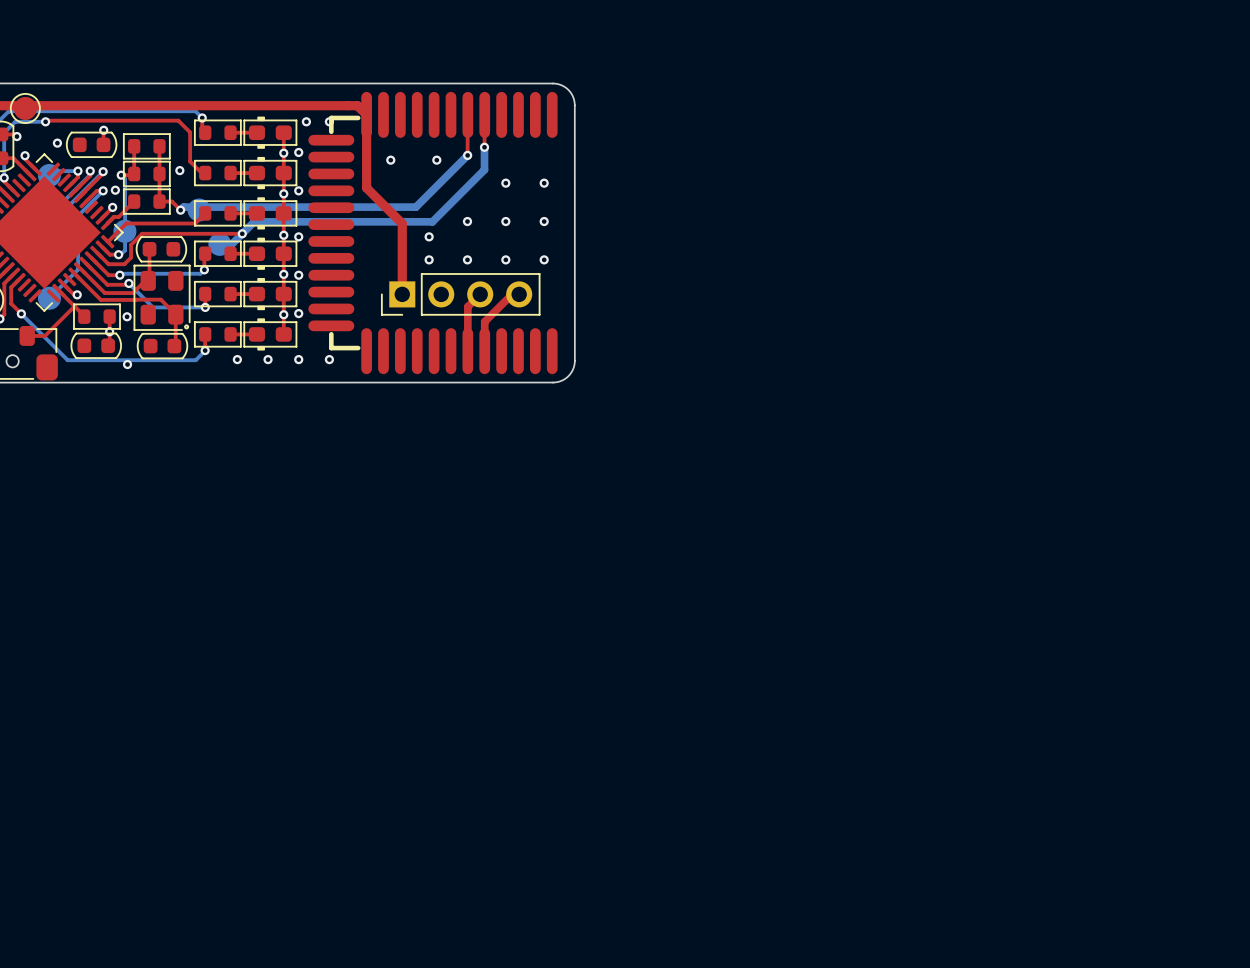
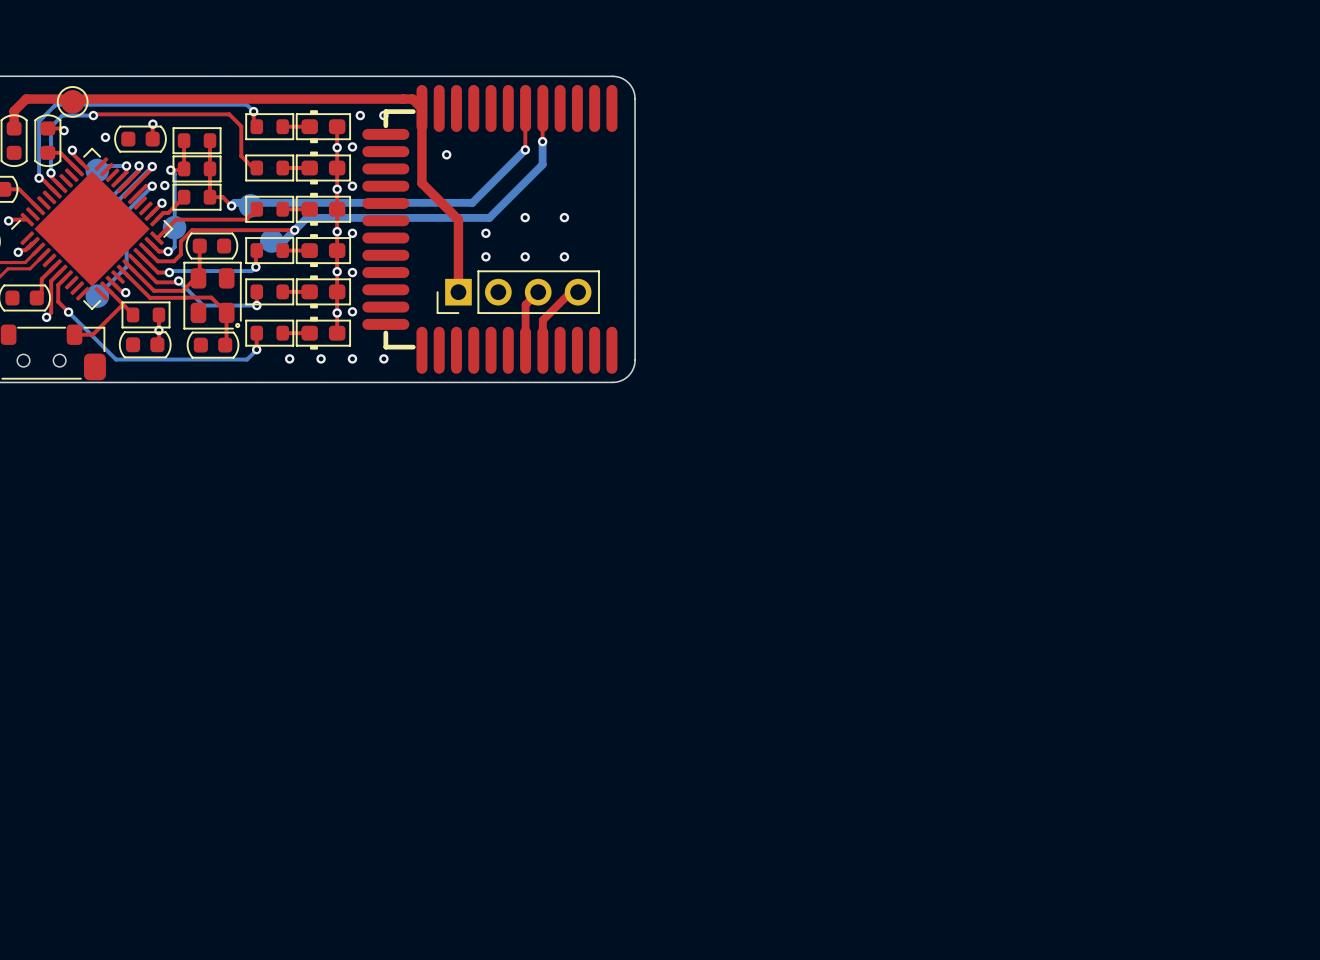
via: (436, 160) -> none
via: (179, 170) -> none
via: (505, 183) -> none
via: (544, 183) -> none
via: (544, 221) -> none
via: (544, 259) -> none
via: (127, 316) -> none
via: (127, 364) -> none

